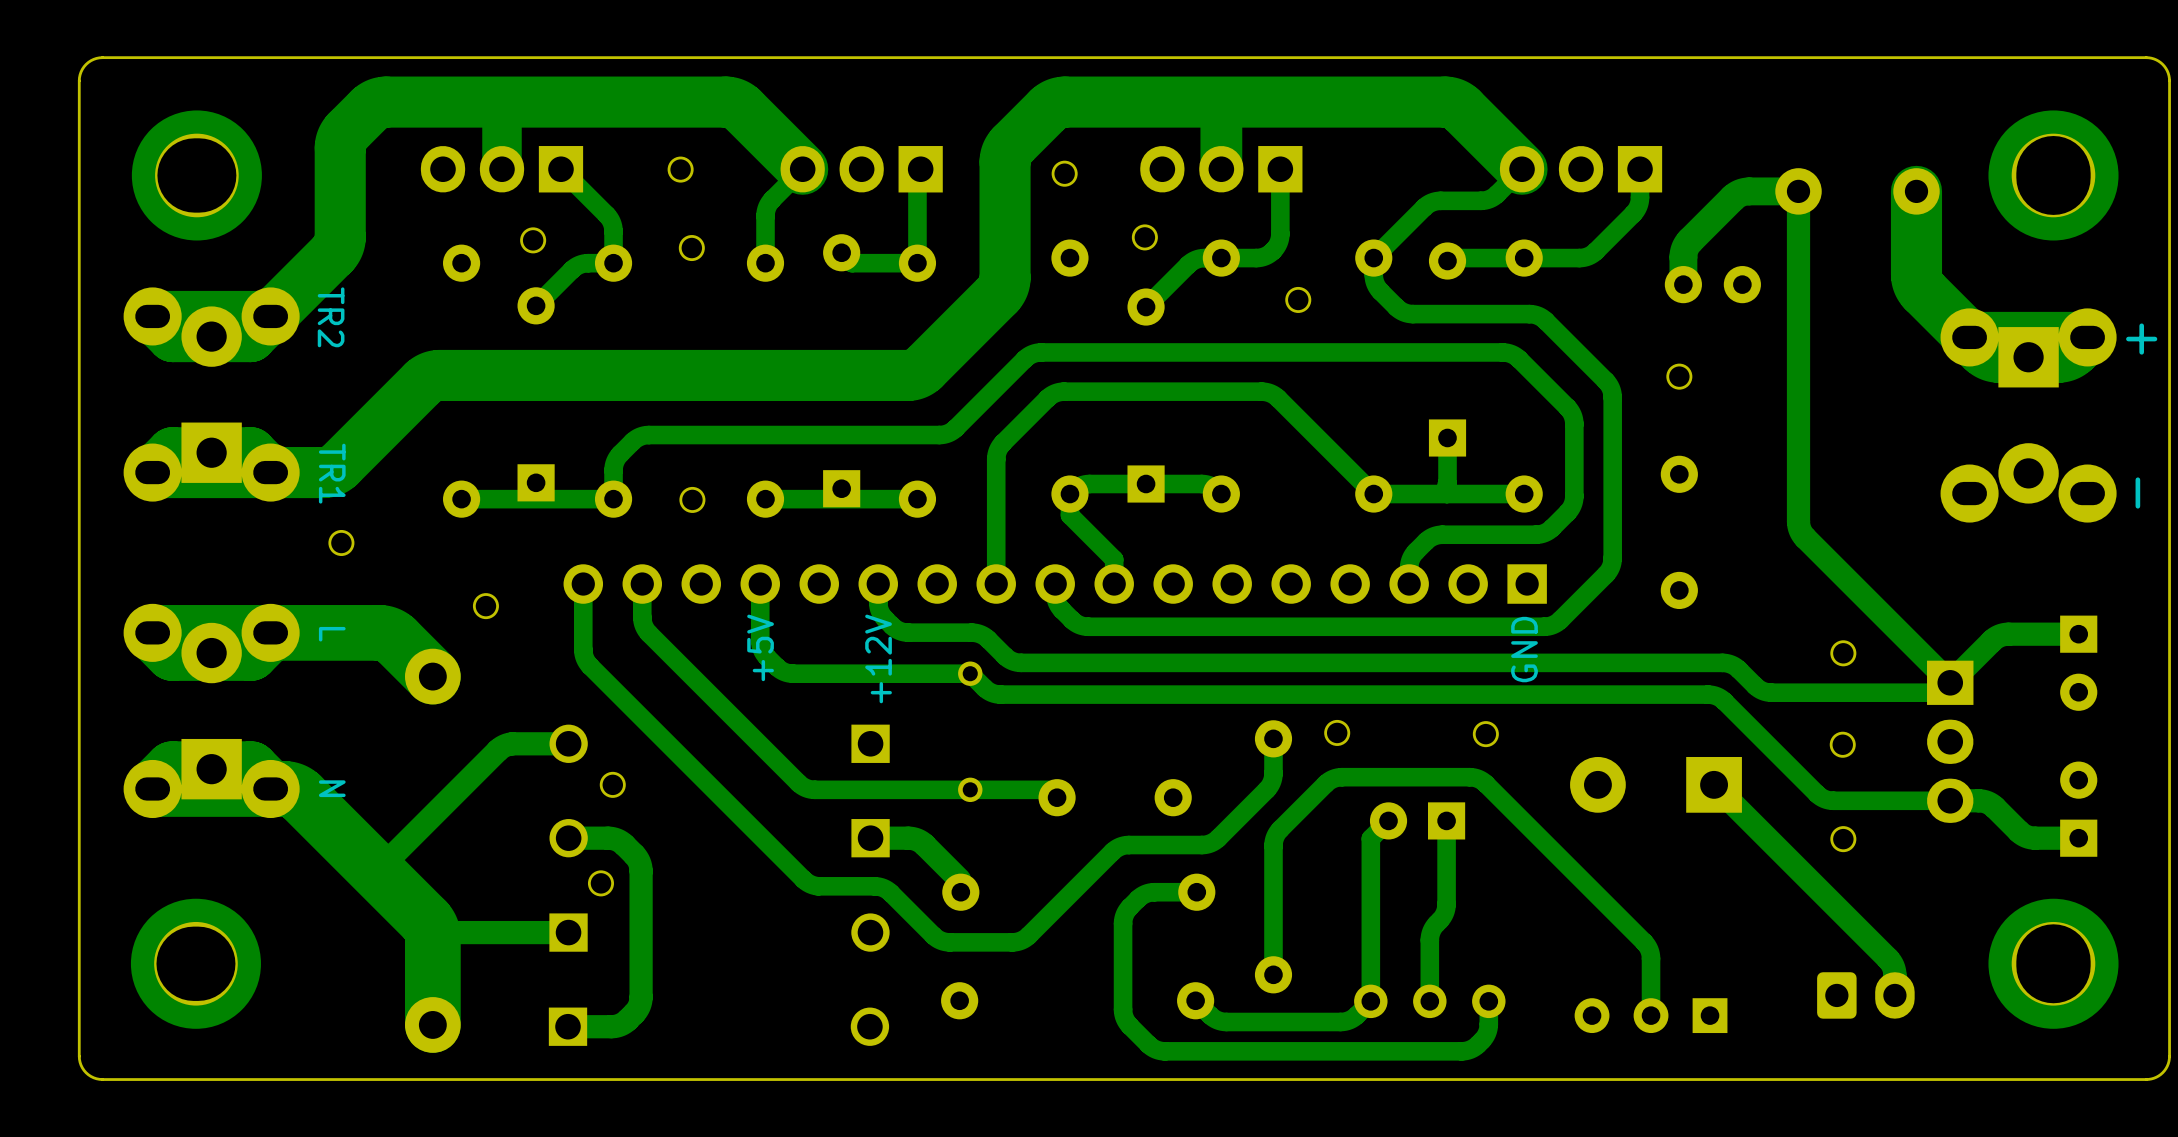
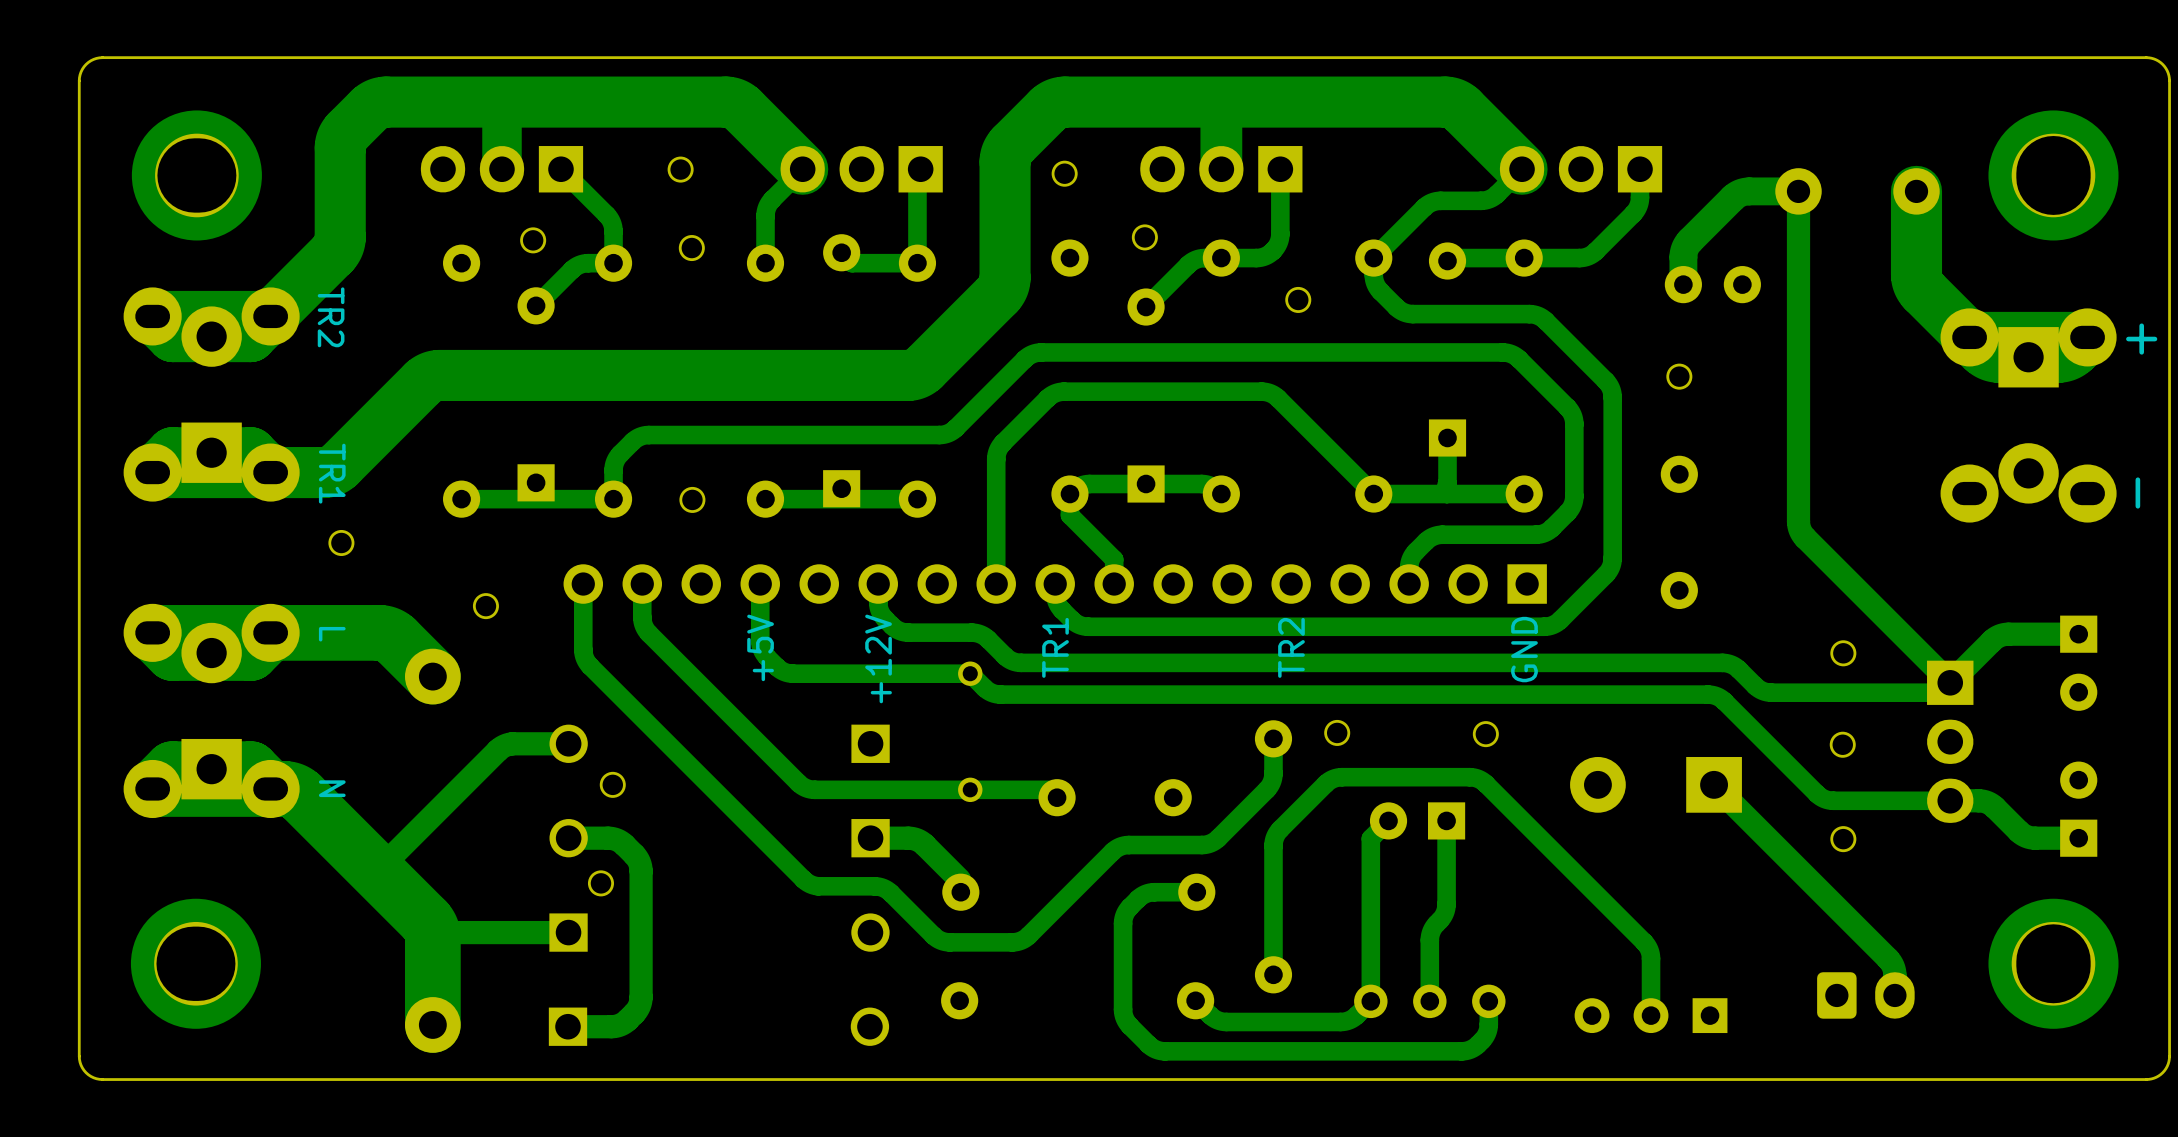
text: none -> TR1 (1055, 647)
text: none -> TR2 (1291, 647)

